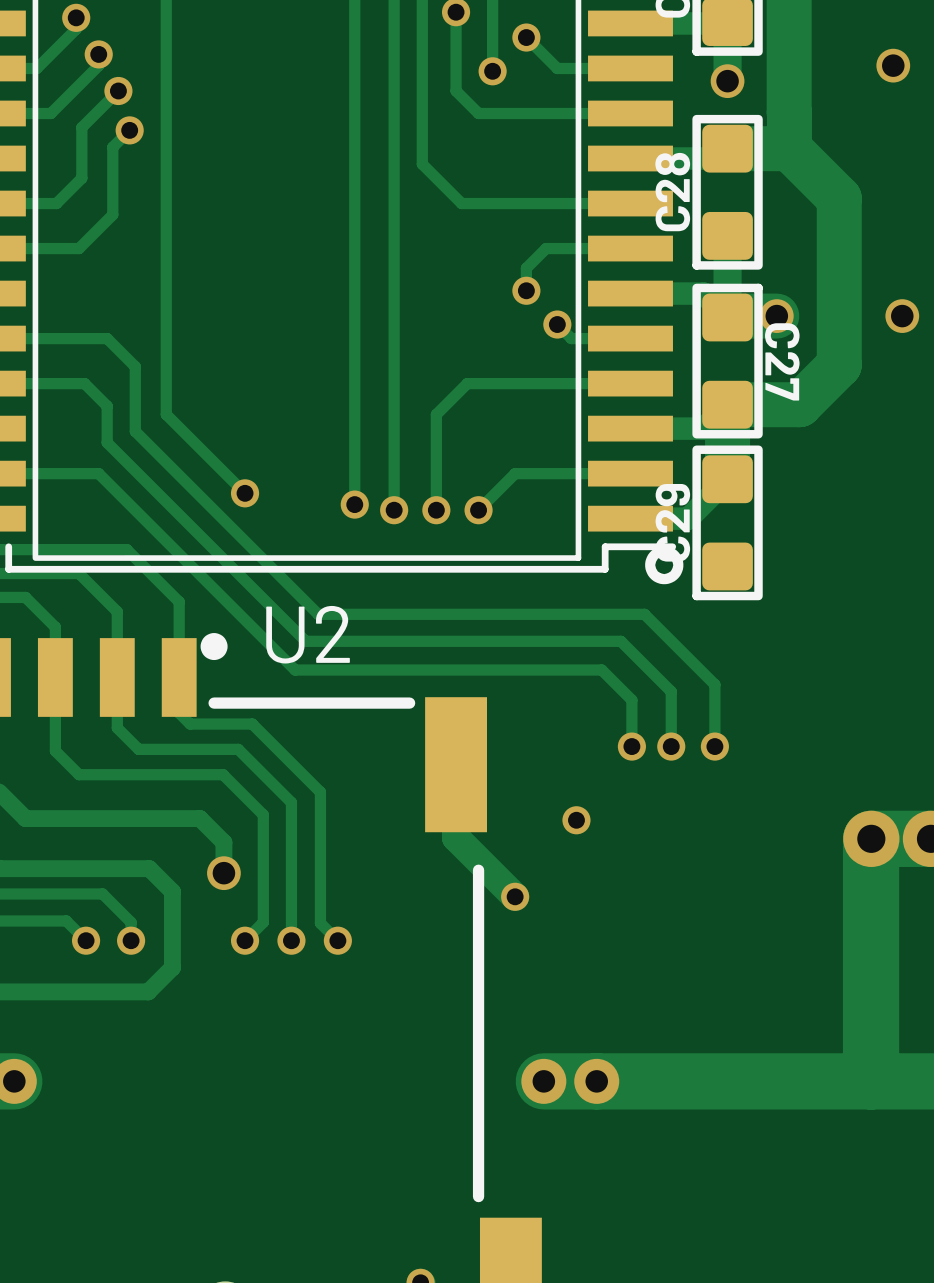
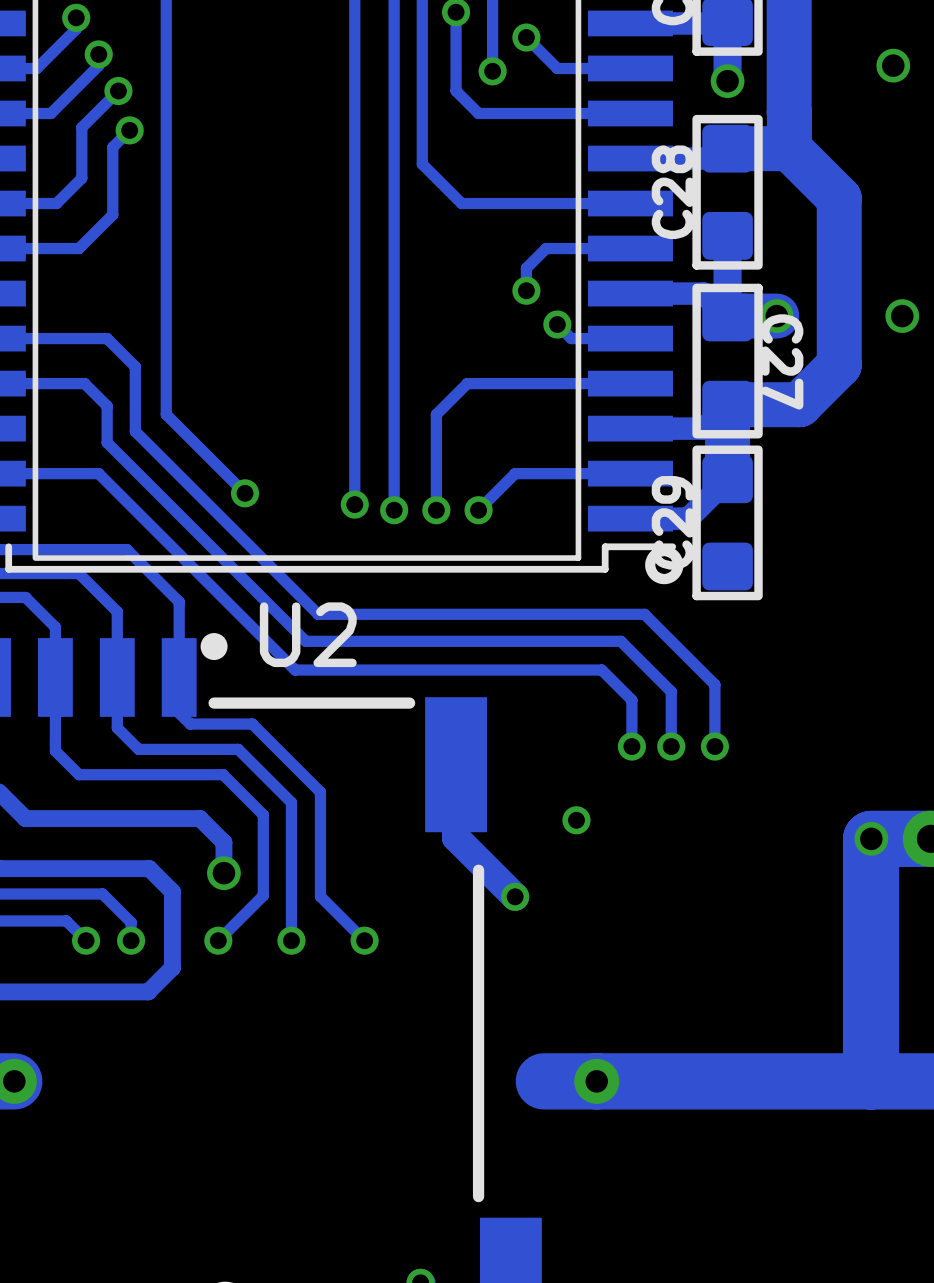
via size: [843, 810, 900, 867] -> [854, 821, 889, 856]
track: (263, 895) (263, 922) (245, 940) -> (263, 895) (218, 940)
track: (320, 896) (320, 923) (337, 940) -> (320, 896) (364, 940)
via position: (245, 940) -> (218, 940)
via position: (337, 940) -> (364, 940)
via: (543, 1081) -> none

